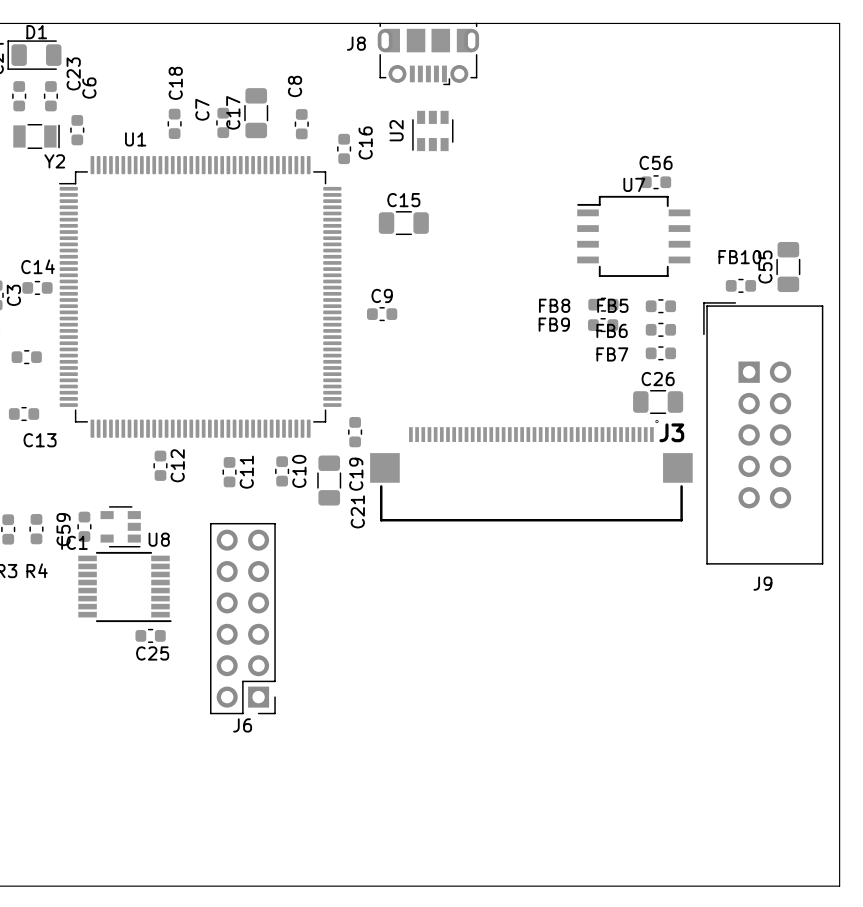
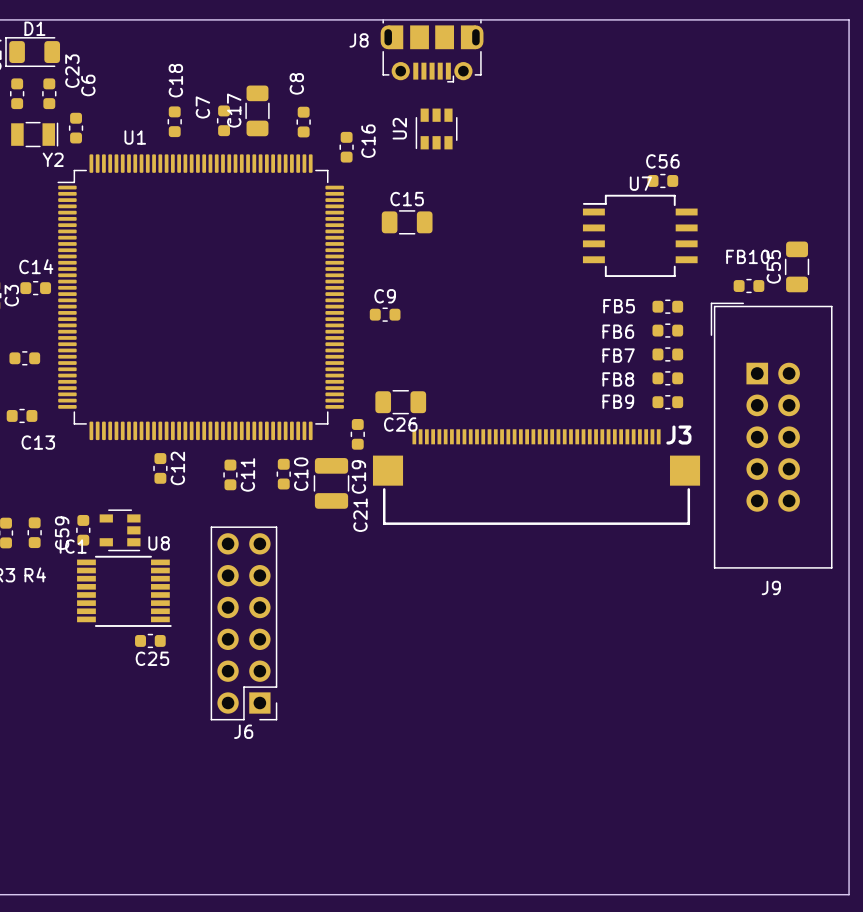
FB8 position: (603, 304) -> (667, 378)
FB9 position: (603, 325) -> (667, 402)
C26 name position: C26 (658, 379) -> C26 (400, 424)
C26 position: (658, 402) -> (400, 402)
J3 footprint: [370, 419, 693, 522] -> [372, 421, 701, 525]
C21 footprint: [317, 455, 342, 506] -> [313, 458, 350, 509]

